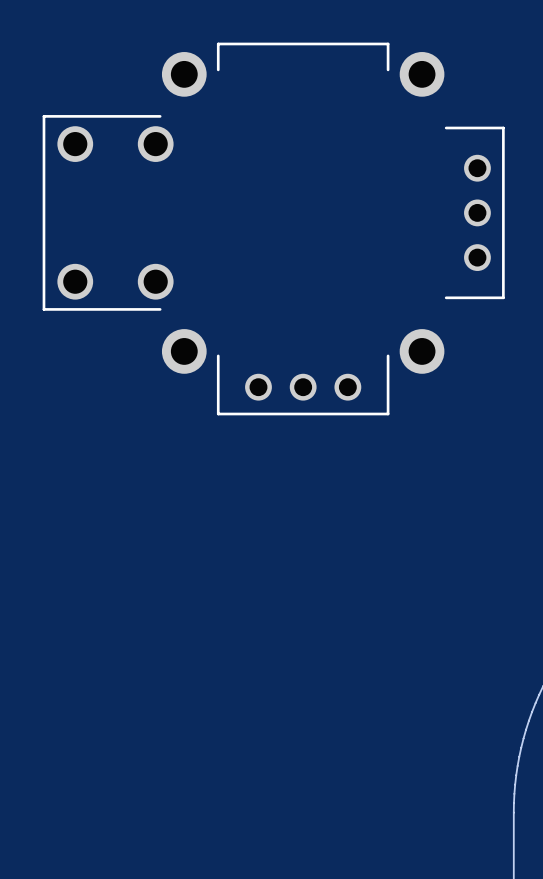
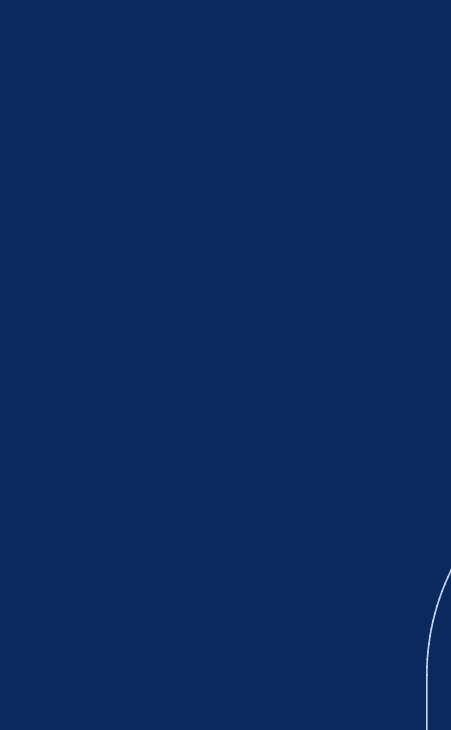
part: (273, 228) -> none

